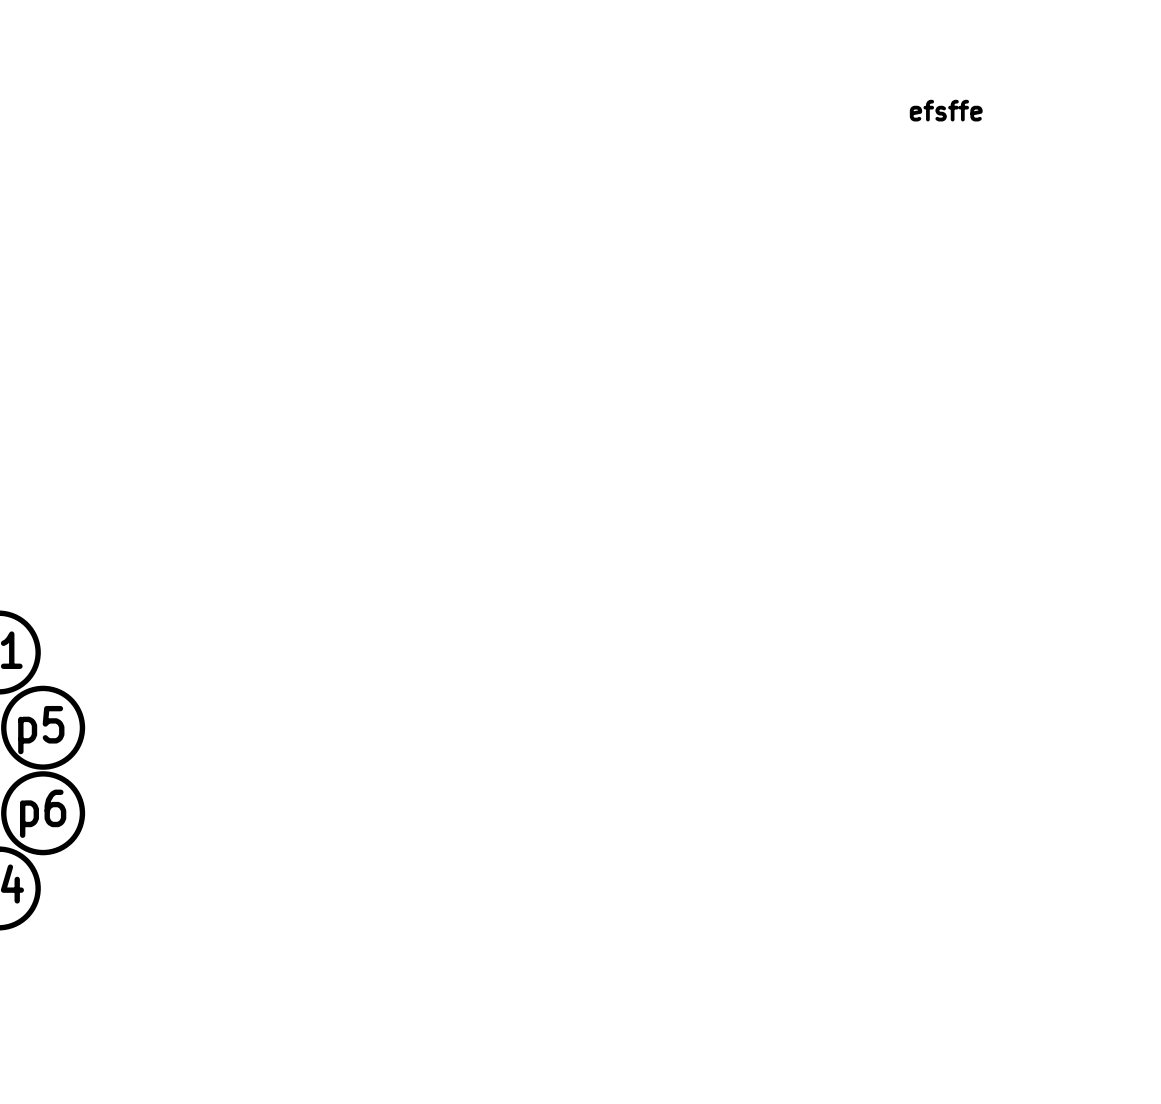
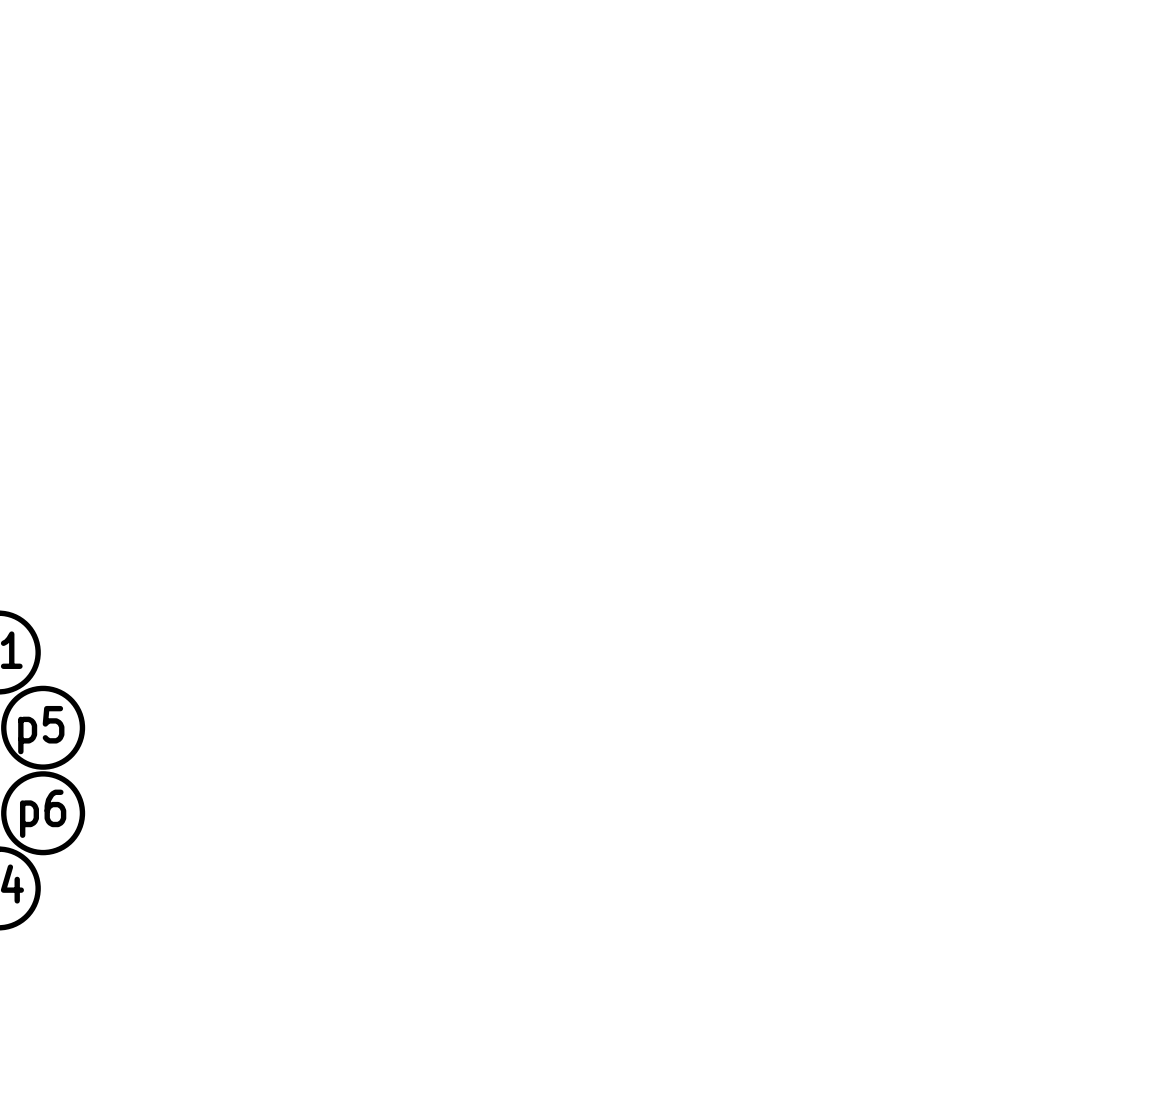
text: efsffe (946, 110) -> none

